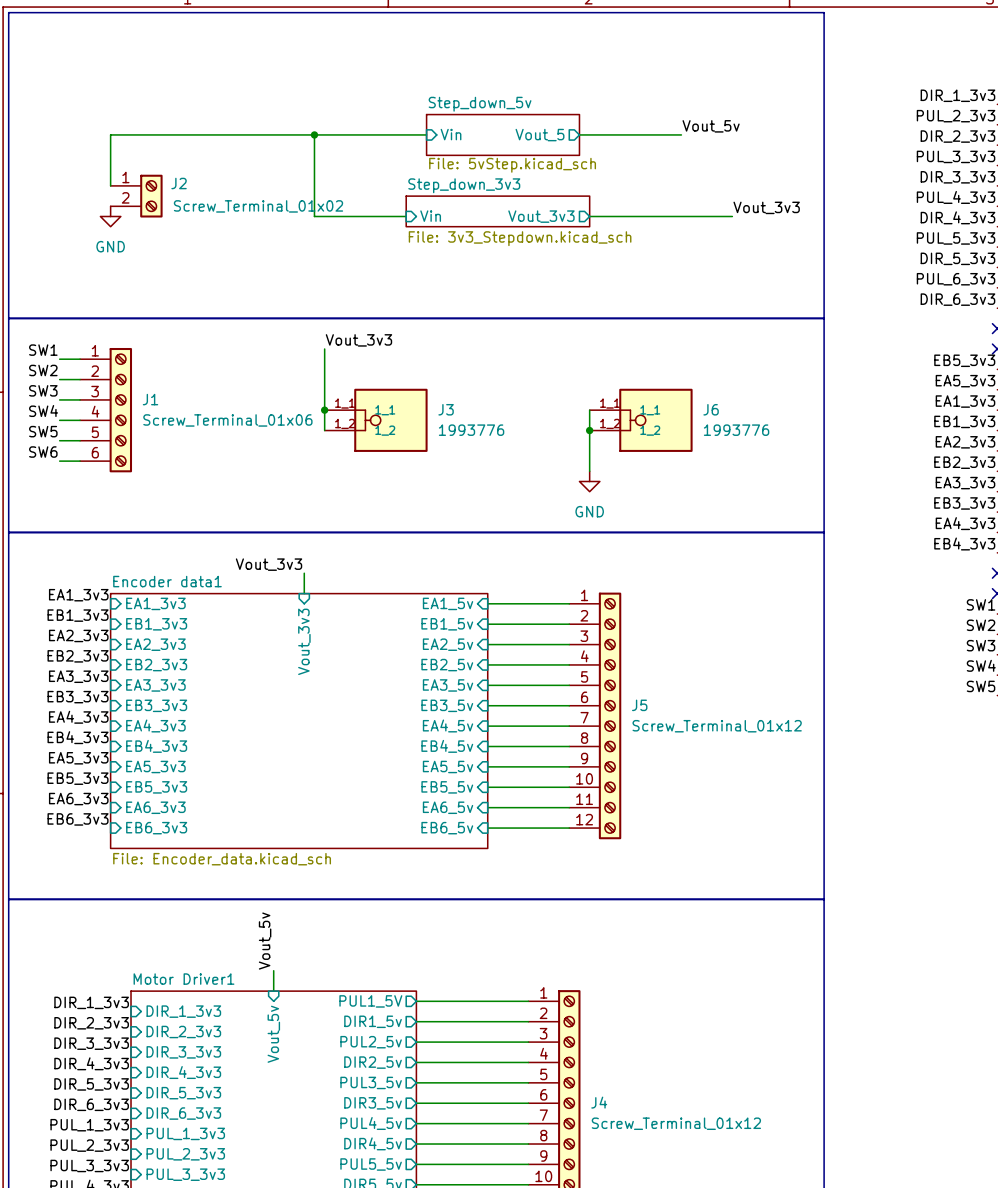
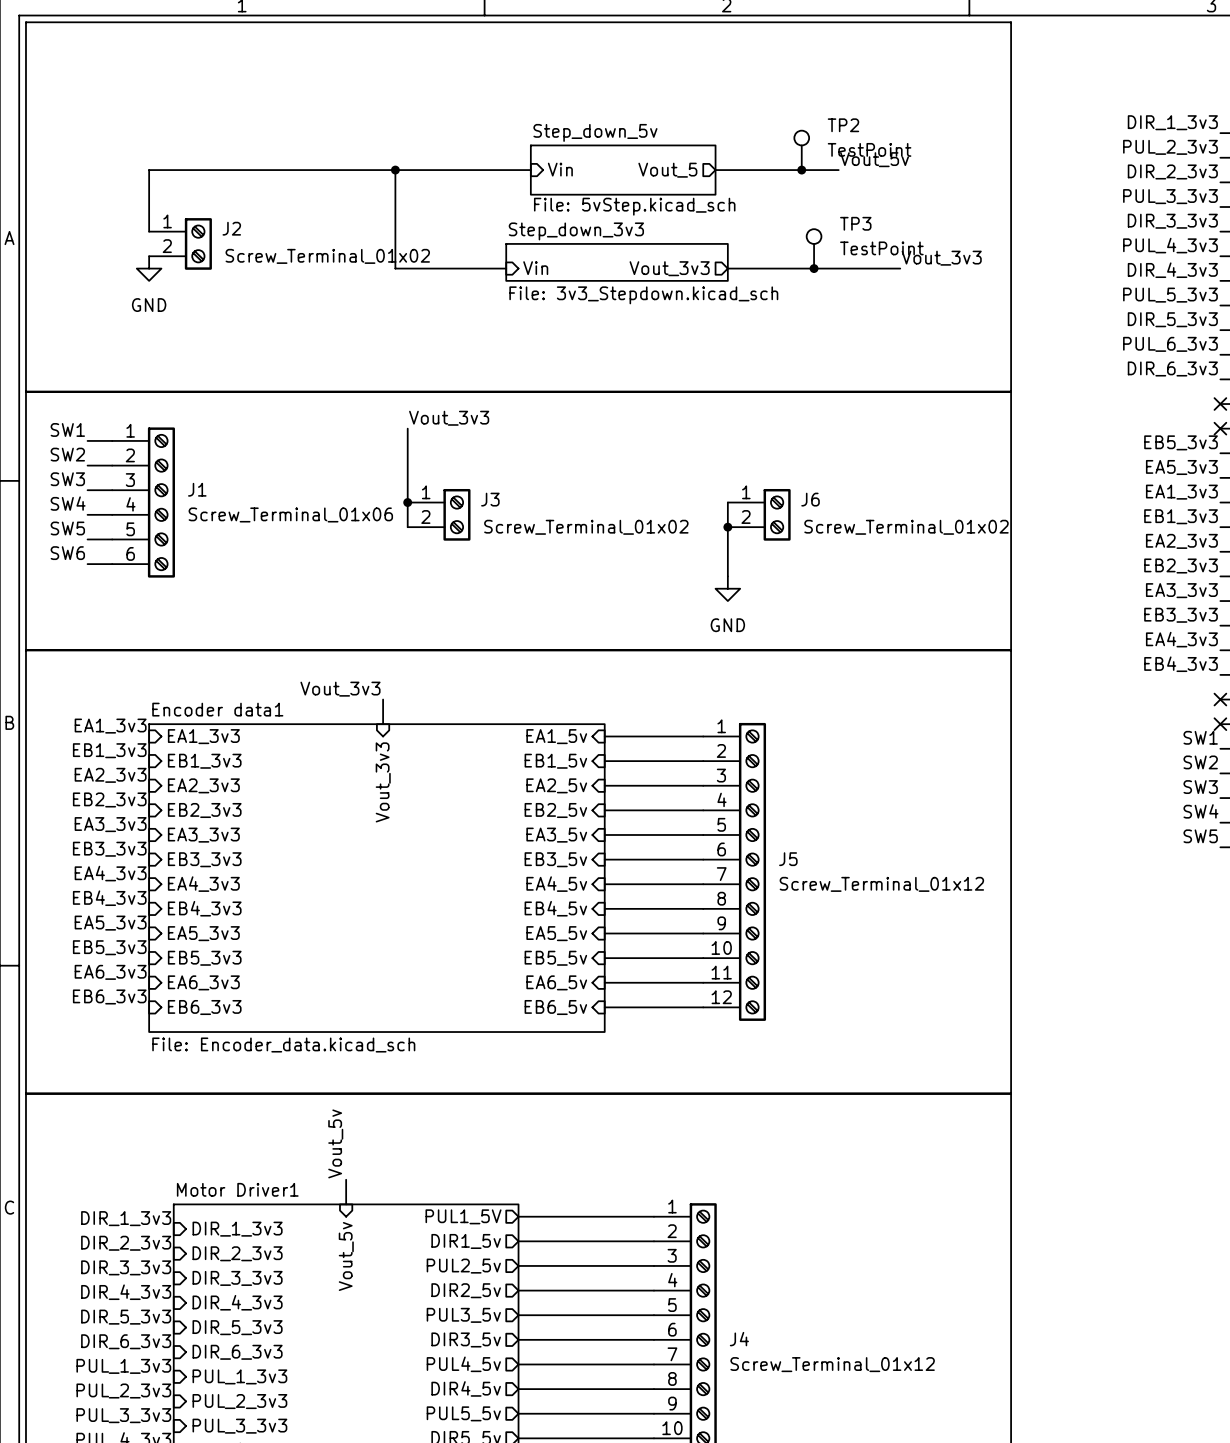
TP2: none -> TestPoint (801, 150)
junction: none -> (801, 170)
TP3: none -> TestPoint (814, 248)
junction: none -> (814, 268)
J3 symbol: [324, 388, 428, 452] -> [407, 488, 471, 541]
J6 symbol: [589, 388, 693, 452] -> [727, 488, 791, 541]
J3 name position: J3 (446, 409) -> J3 (490, 499)
J6 name position: J6 (711, 409) -> J6 (810, 499)
J3 value: 1993776 (471, 430) -> Screw_Terminal_01x02 (586, 527)
J6 value: 1993776 (736, 430) -> Screw_Terminal_01x02 (906, 527)

